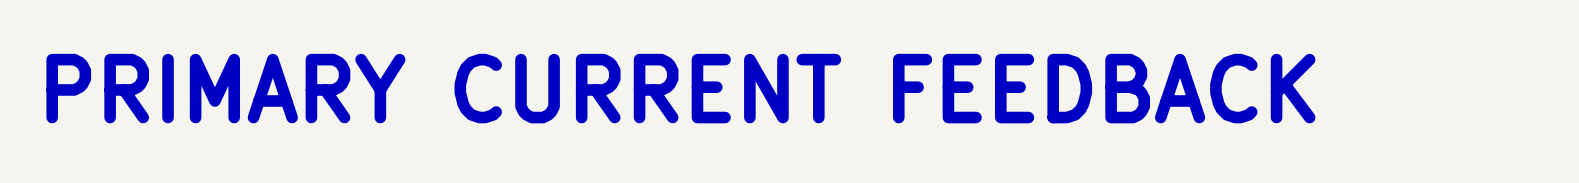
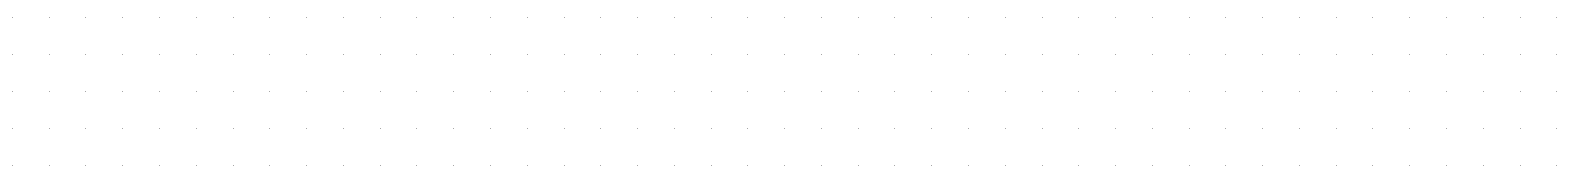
text: PRIMARY CURRENT FEEDBACK (680, 88) -> none

